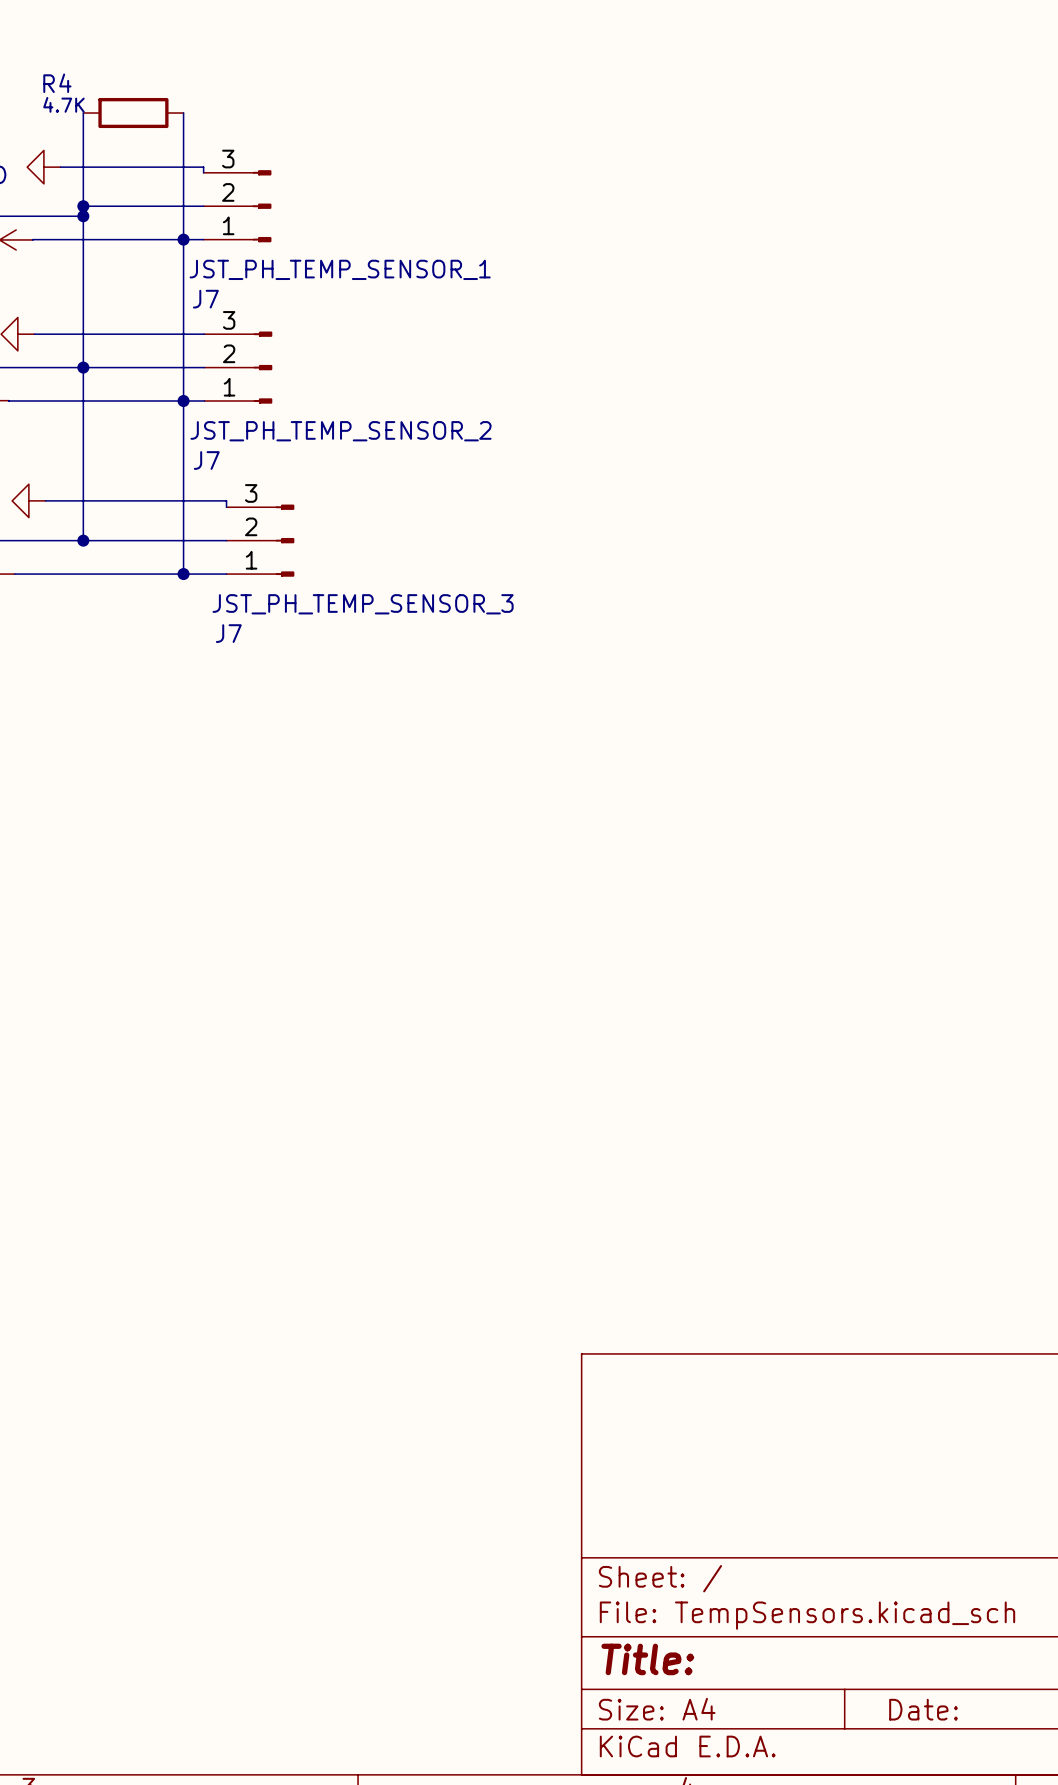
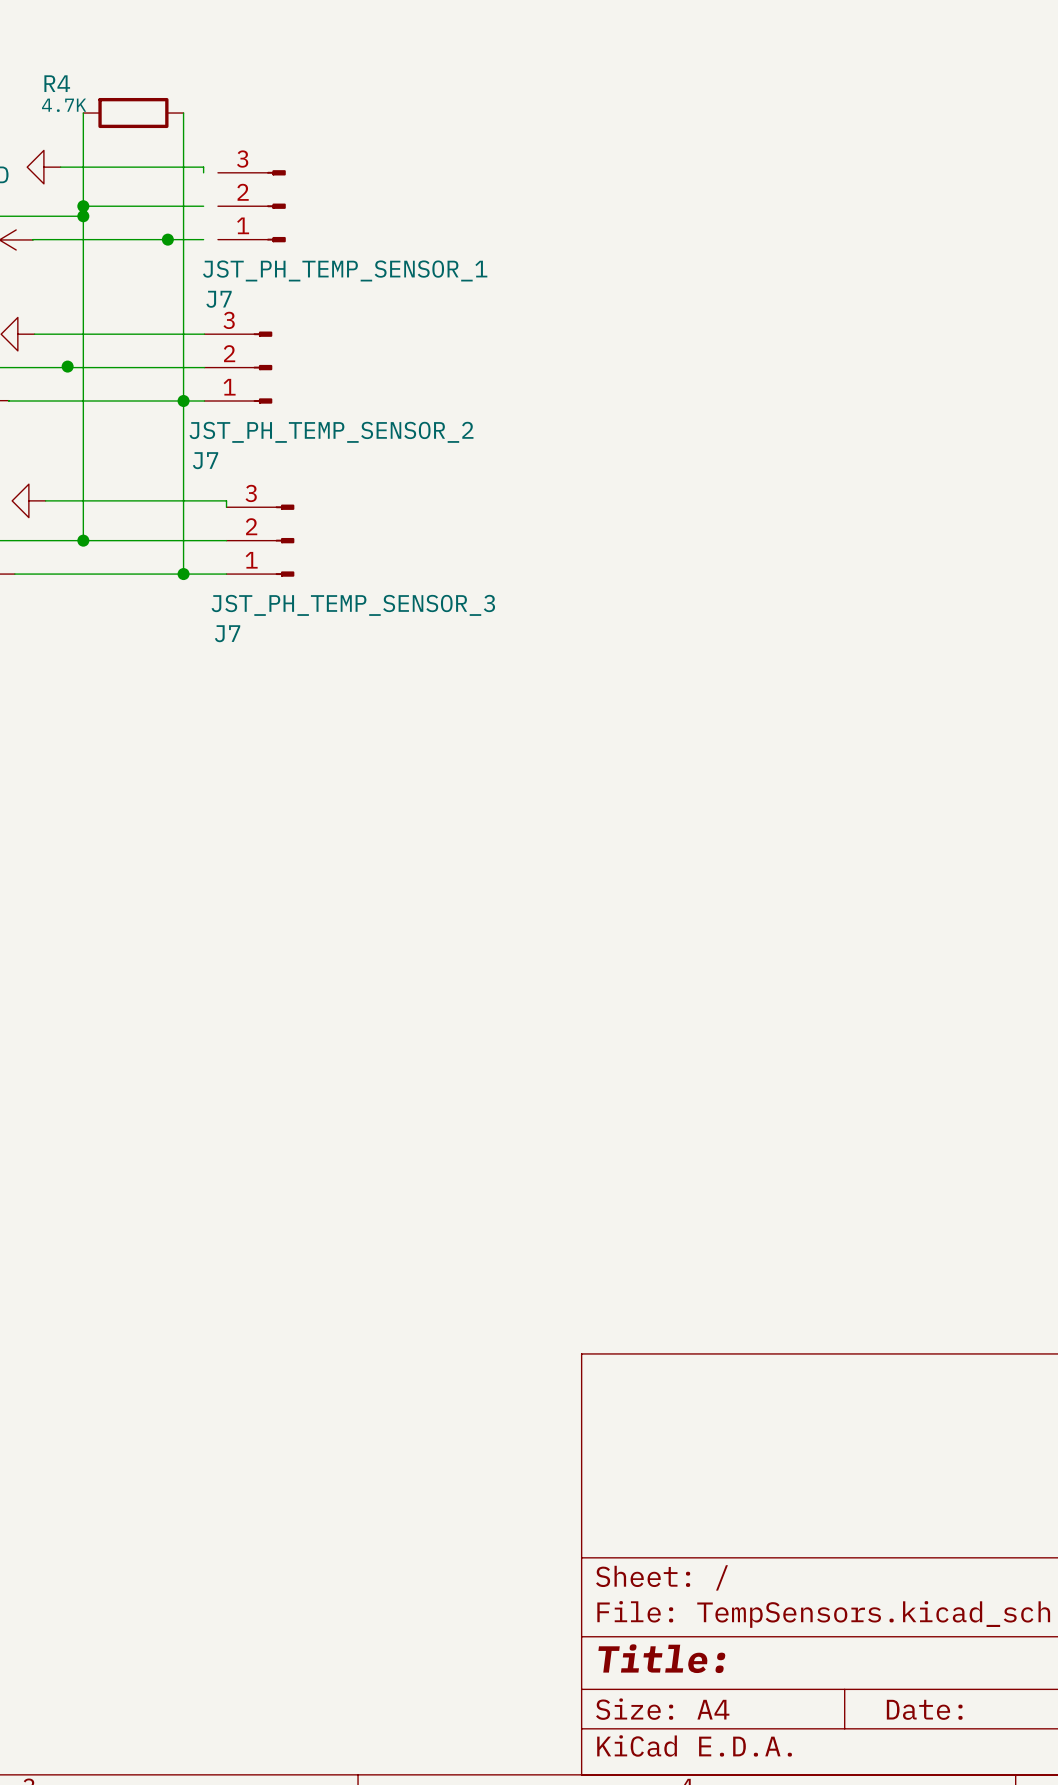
J7 position: (237, 206) -> (251, 206)
junction position: (183, 239) -> (167, 239)
junction position: (83, 367) -> (67, 366)

